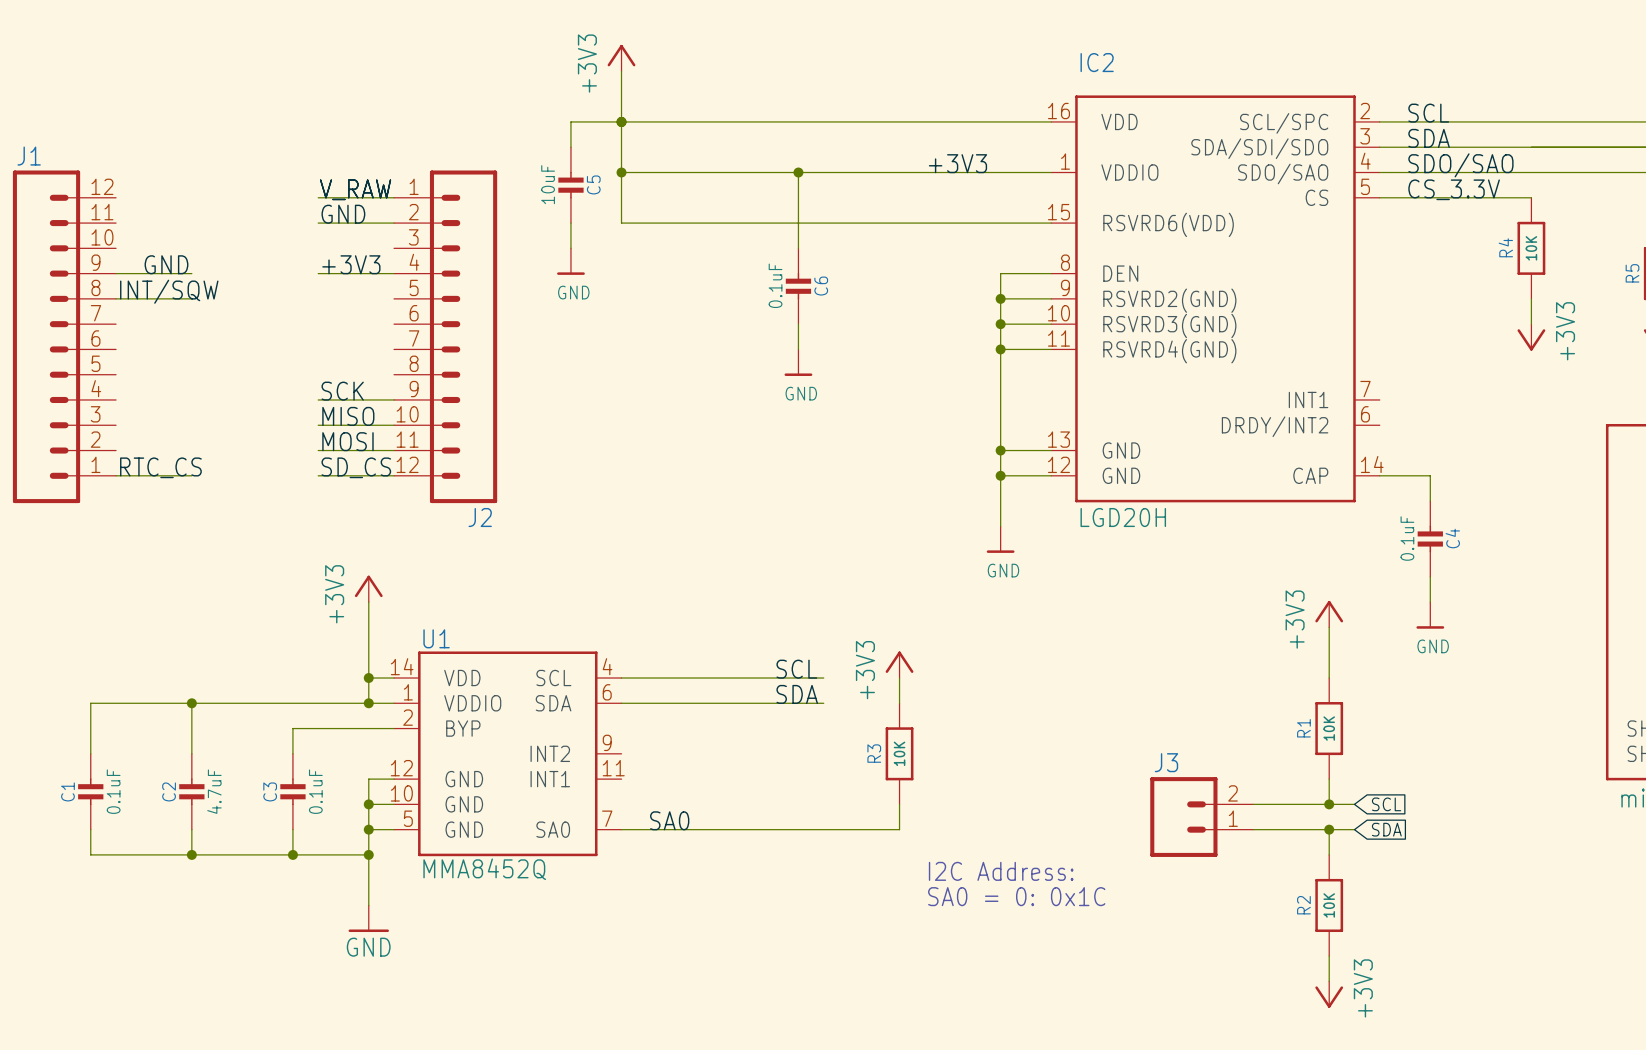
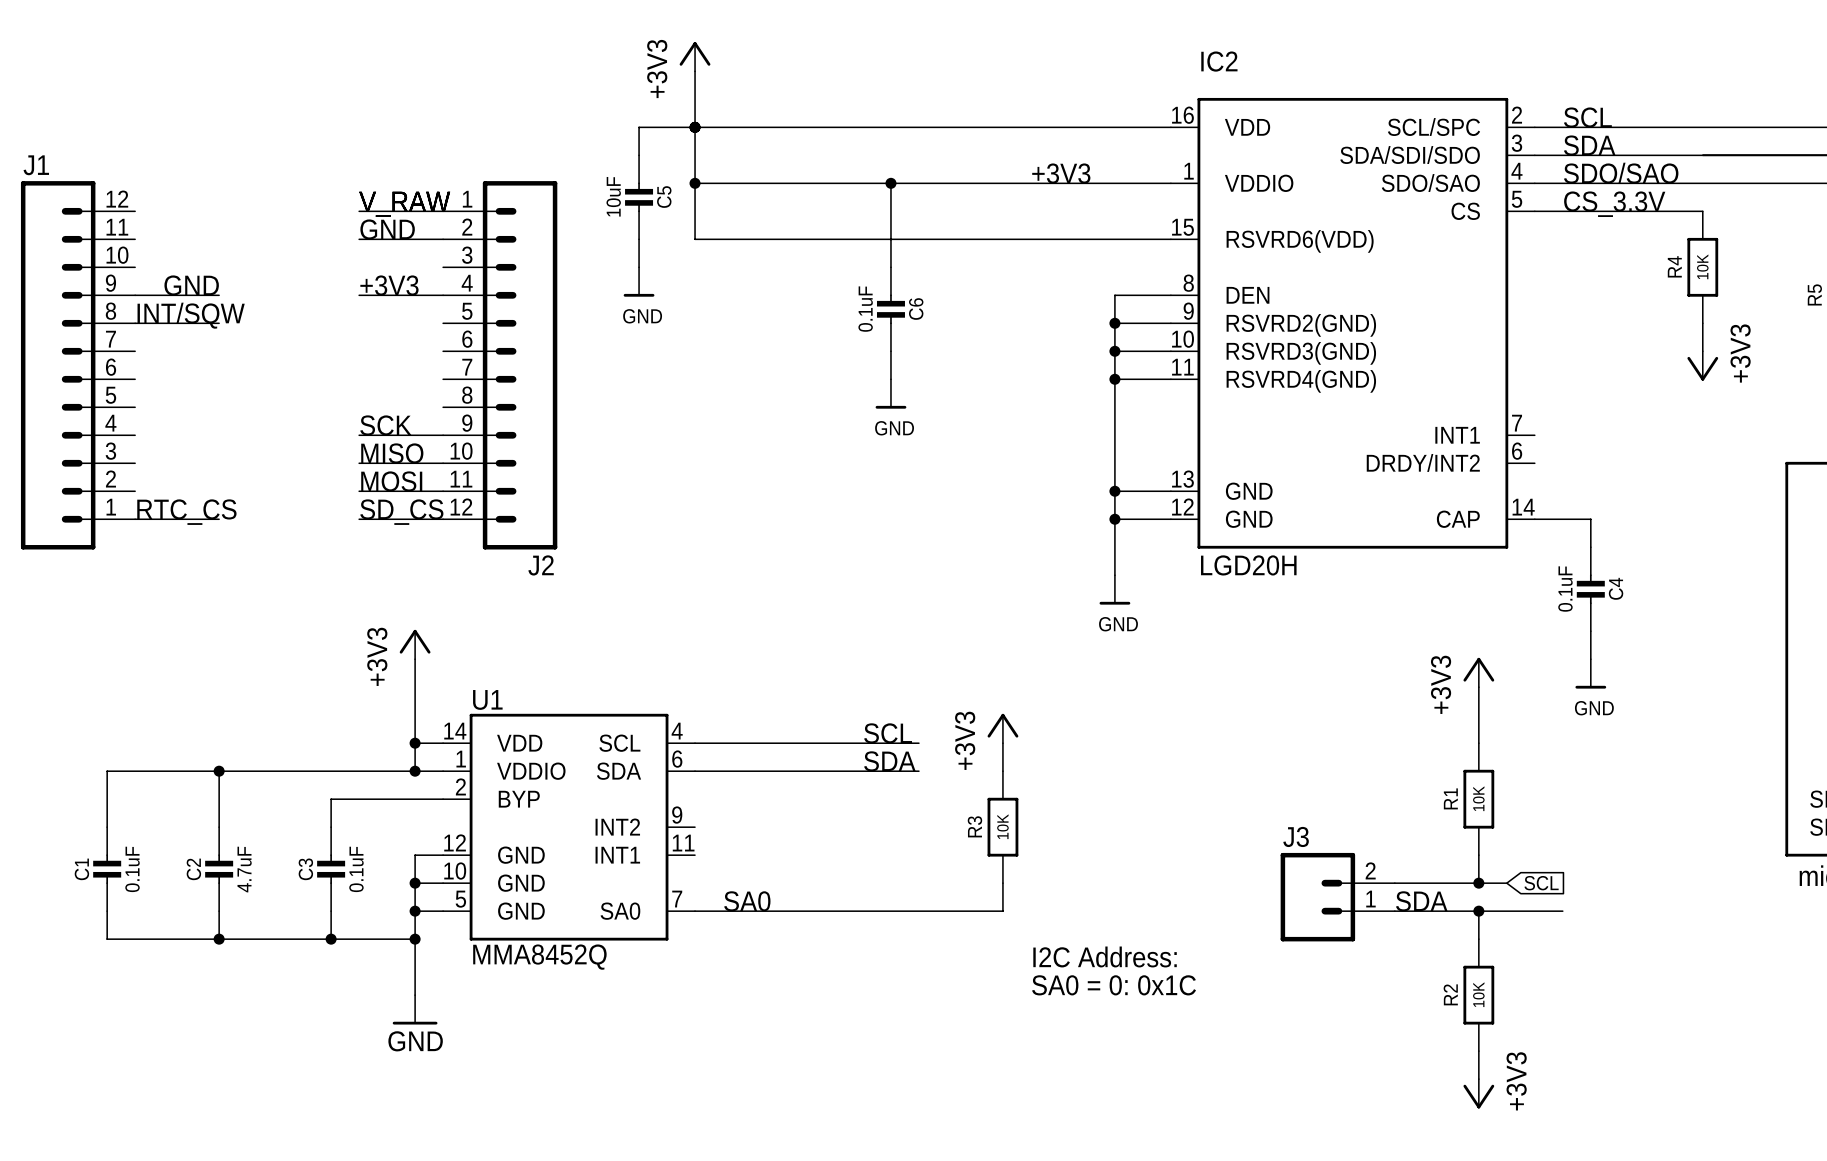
label: none -> SDA (1421, 901)
wire: none -> (1506, 911) (1562, 911)
global label: SDA (1386, 829) -> none

